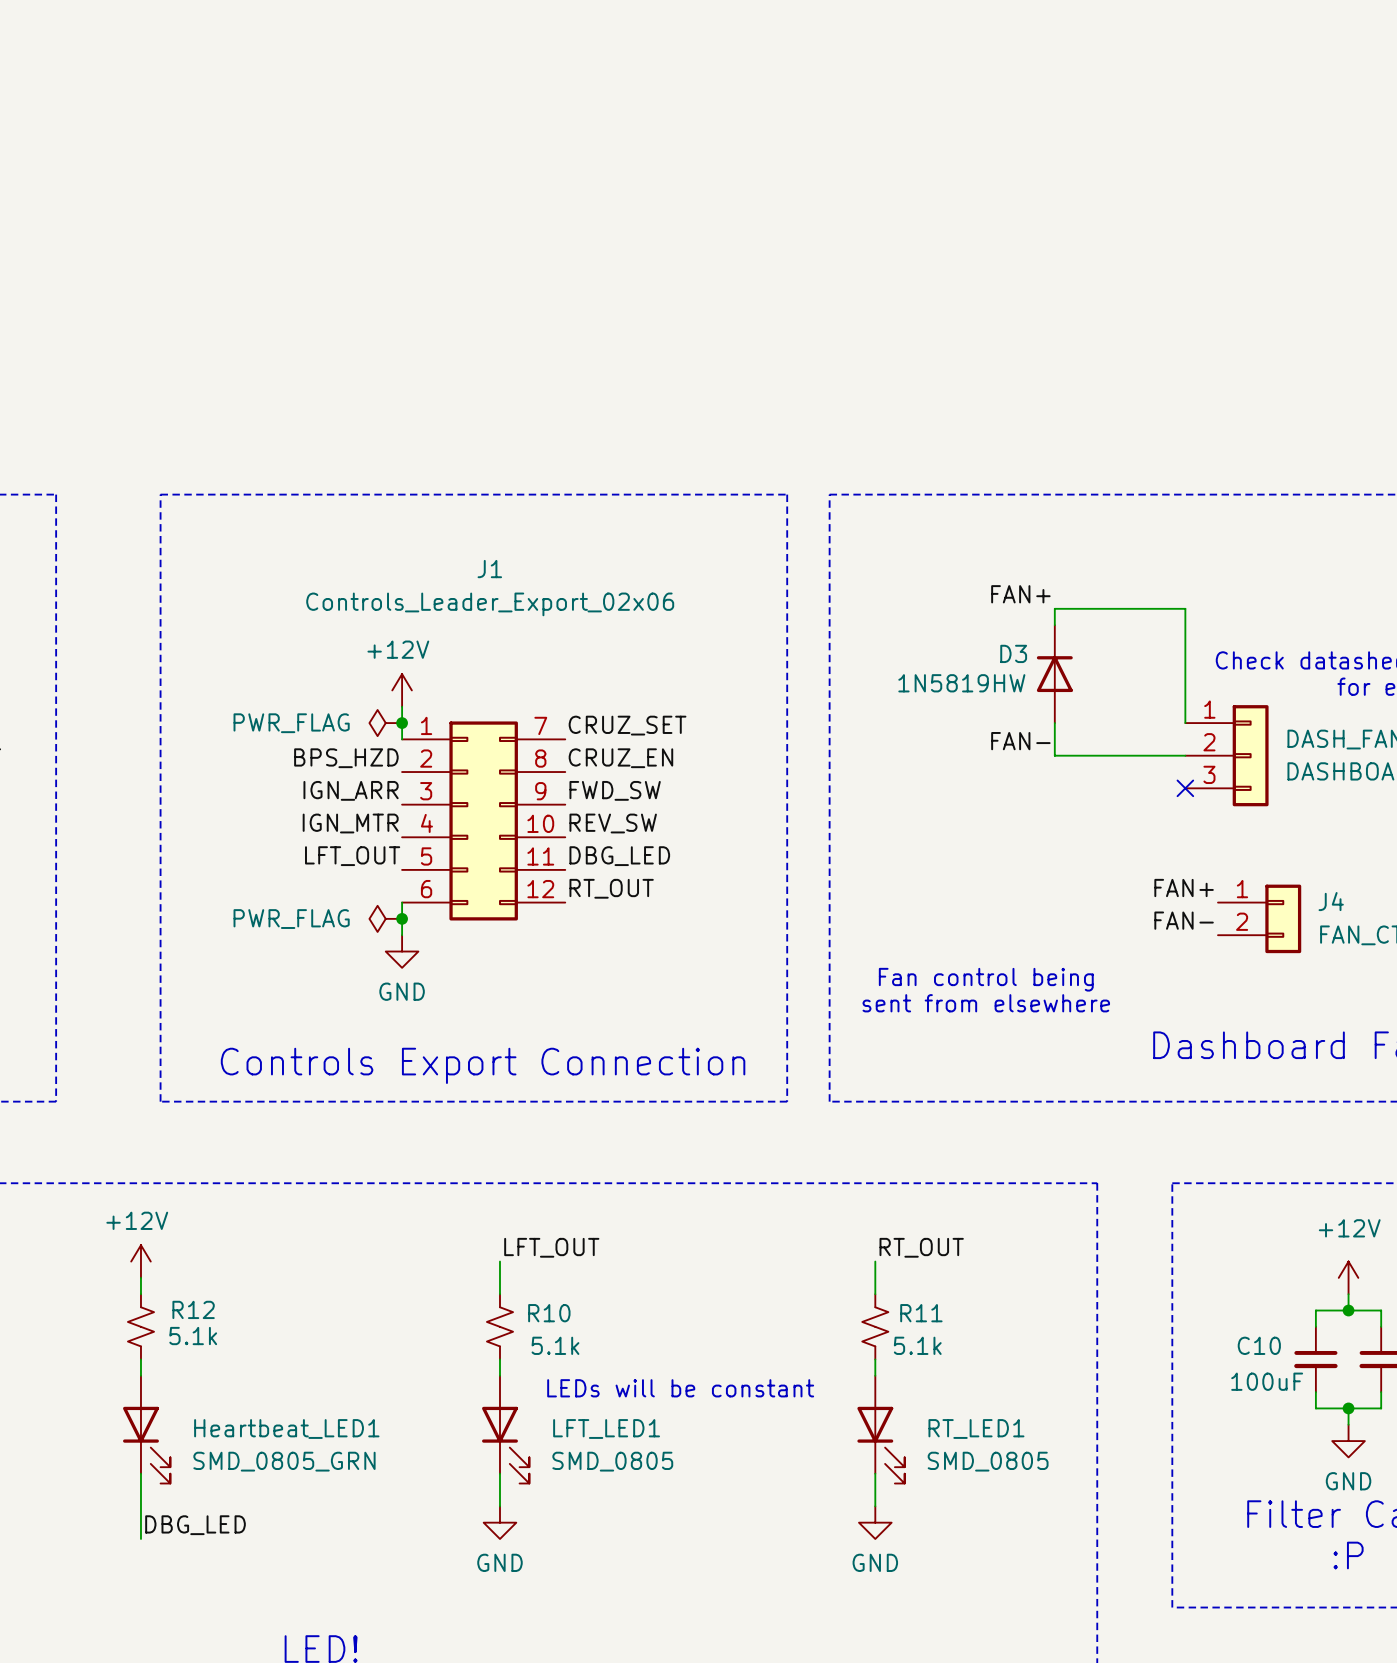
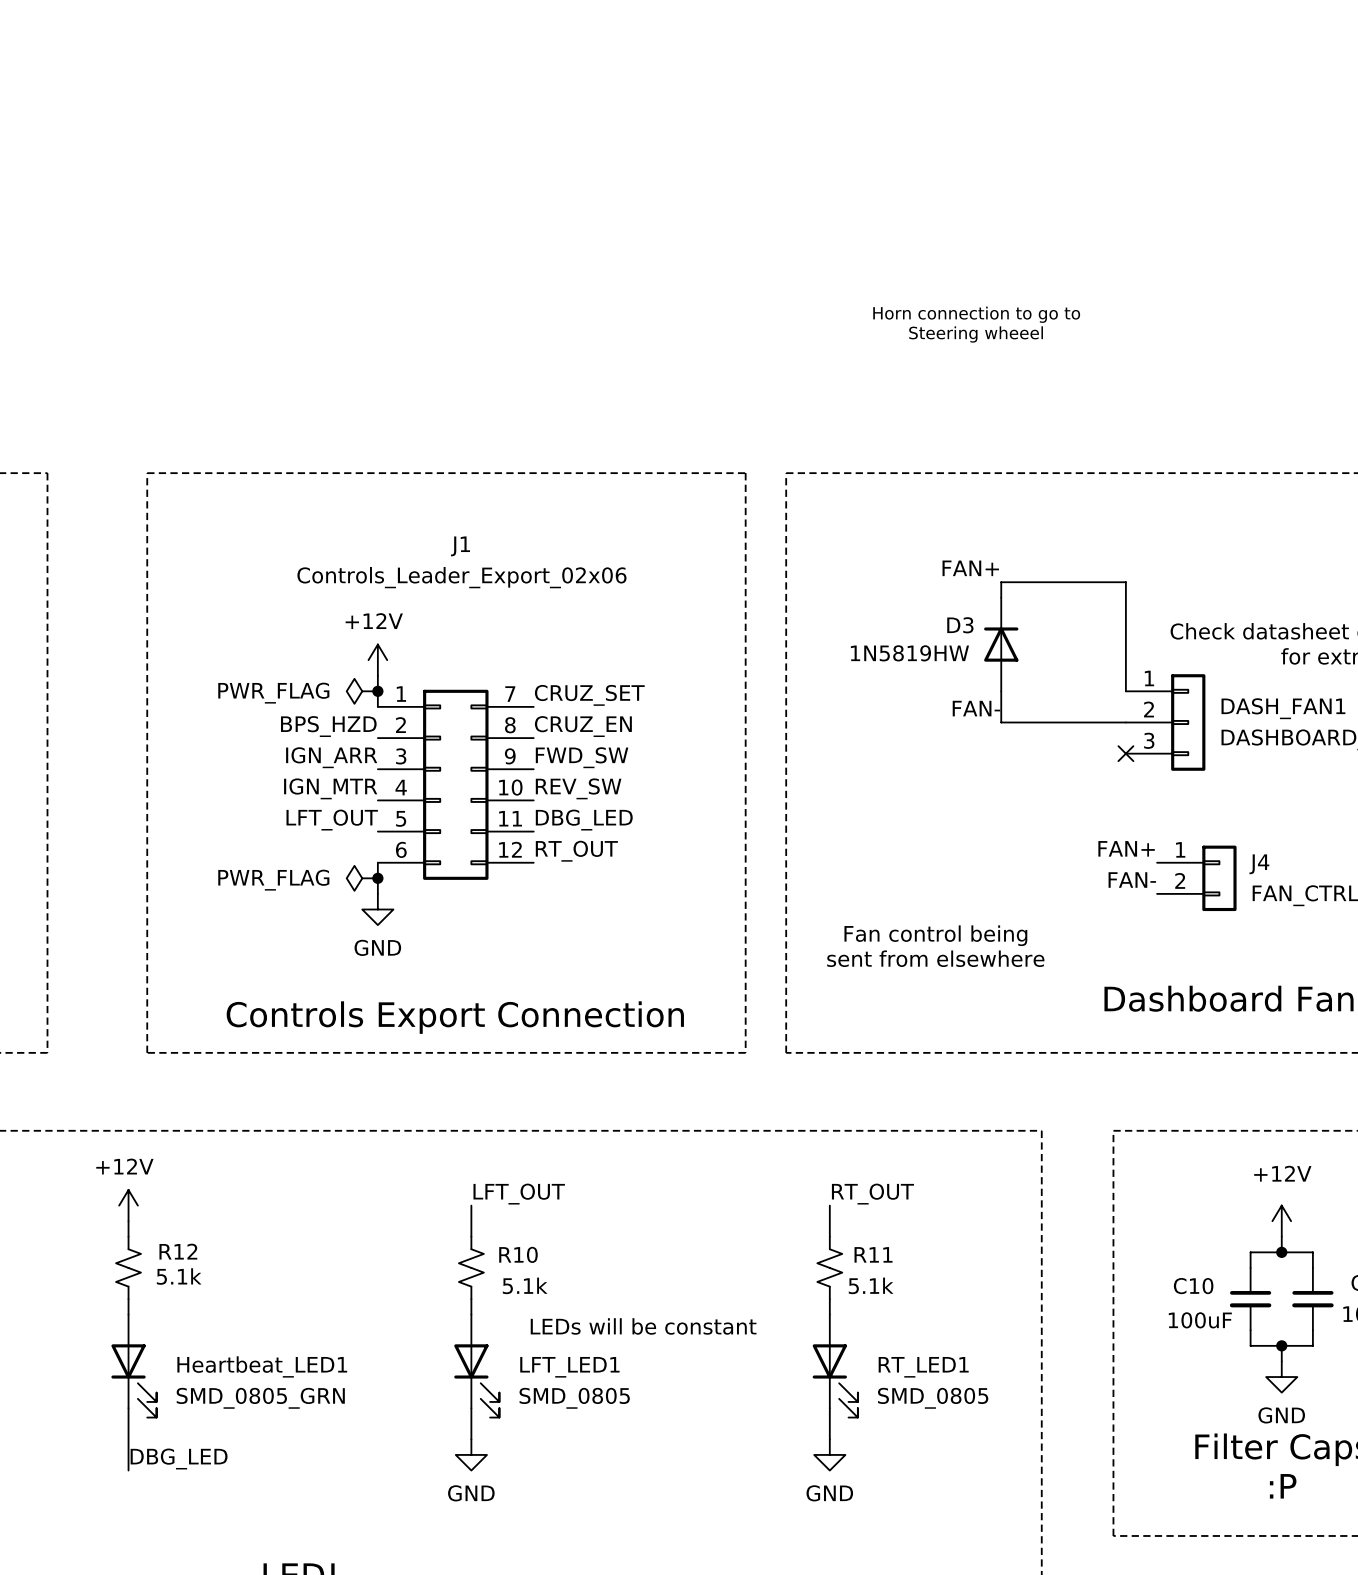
text: none -> Horn connection to go to (976, 314)
text: none -> Steering wheeel (976, 334)

